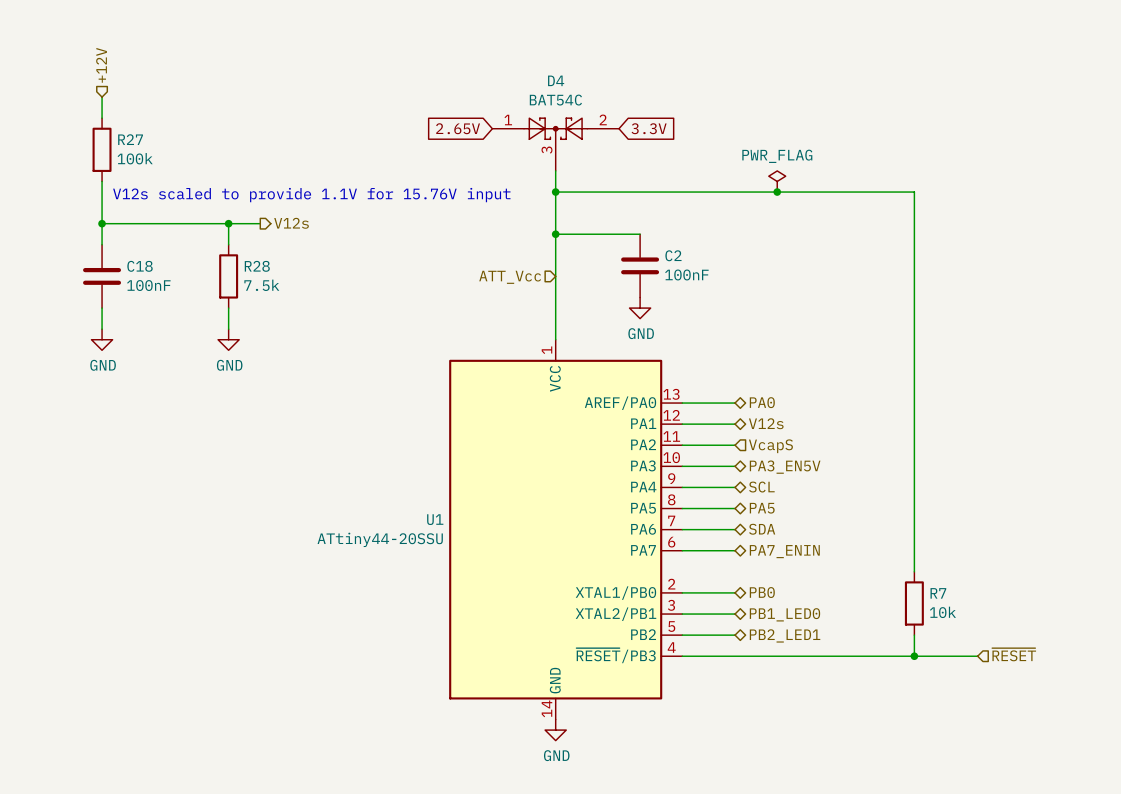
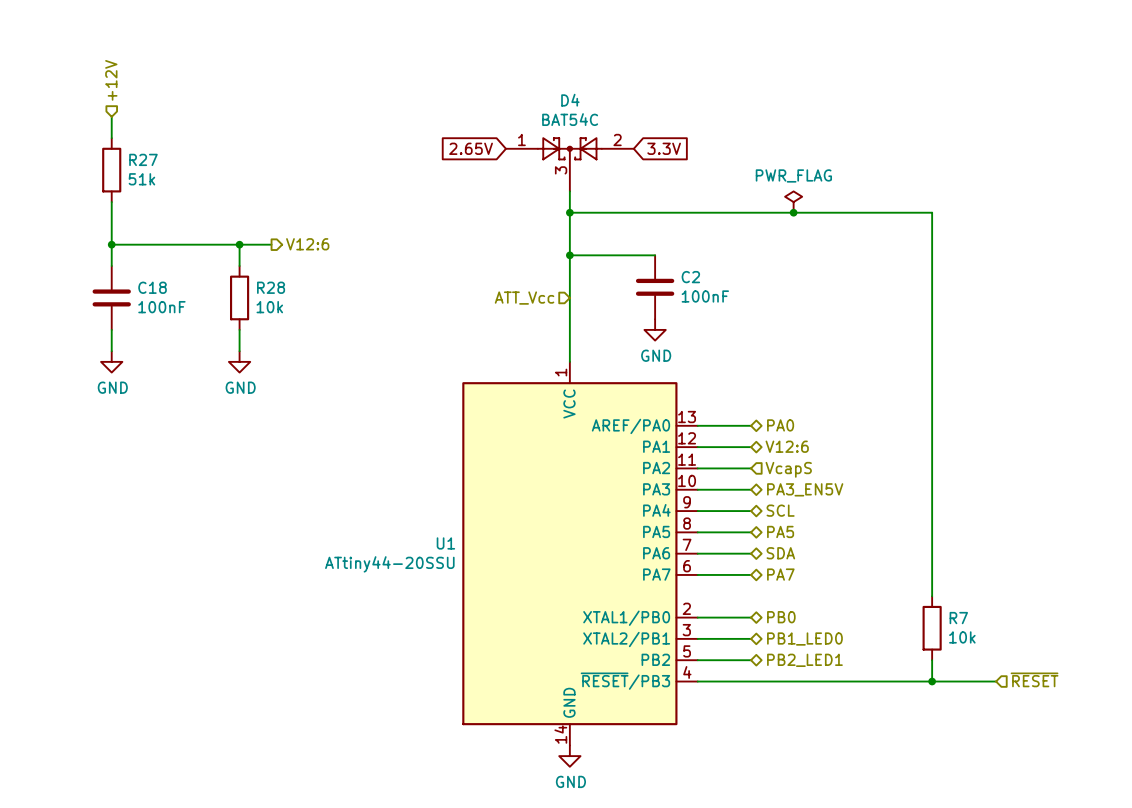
R27 value: 100k (135, 158) -> 51k (141, 179)
text: V12s scaled to provide 1.1V for 15.76V input (311, 195) -> none
hierarchical label: V12s (291, 223) -> V12:6 (307, 244)
R28 value: 7.5k (261, 285) -> 10k (269, 307)
hierarchical label: V12s (766, 423) -> V12:6 (787, 446)
hierarchical label: PA7_ENIN (784, 551) -> PA7 (780, 574)

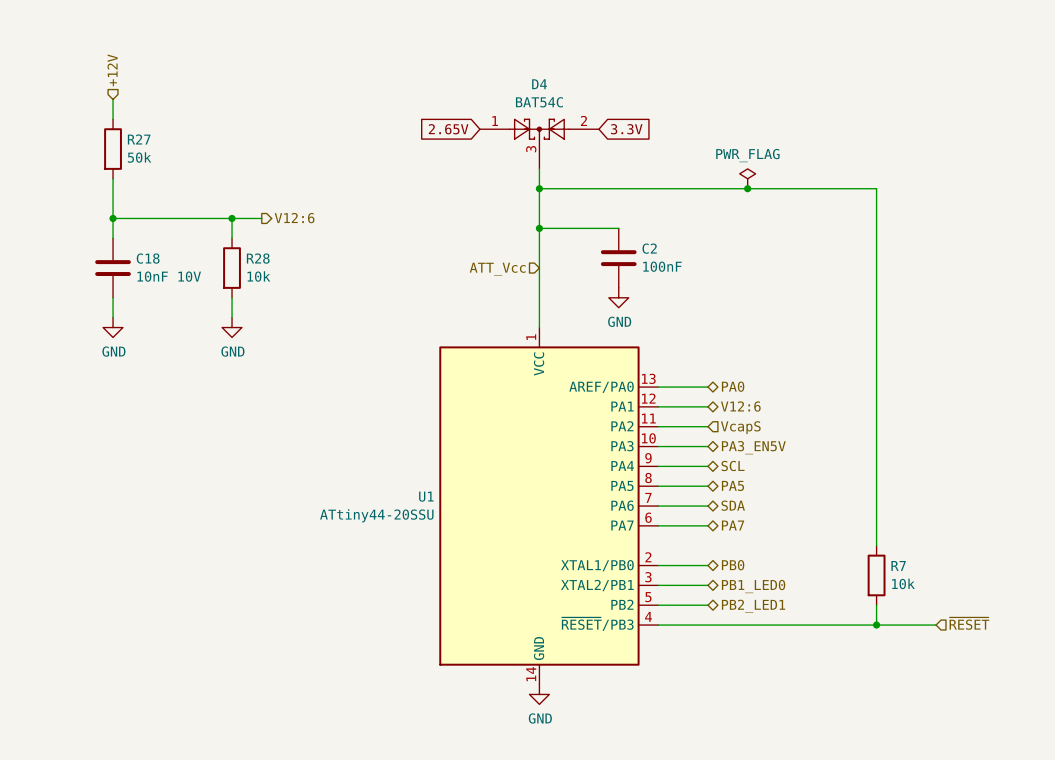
R27 value: 51k (141, 179) -> 50k (139, 157)
C18 value: 100nF (161, 307) -> 10nF 10V (169, 276)

